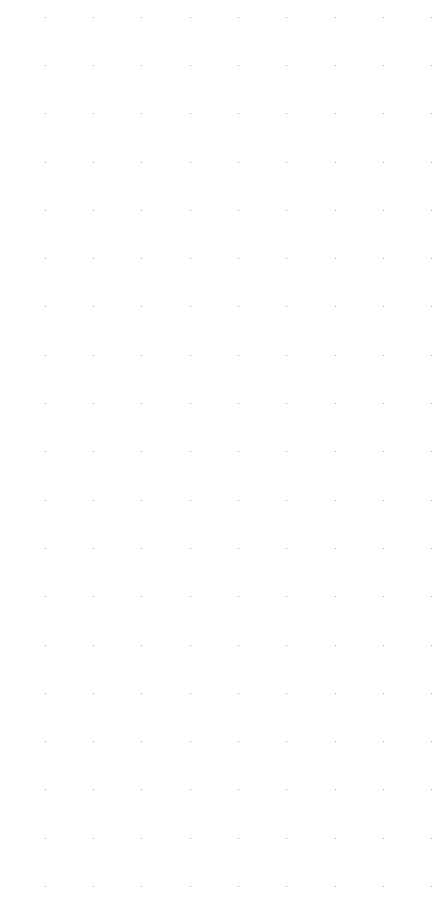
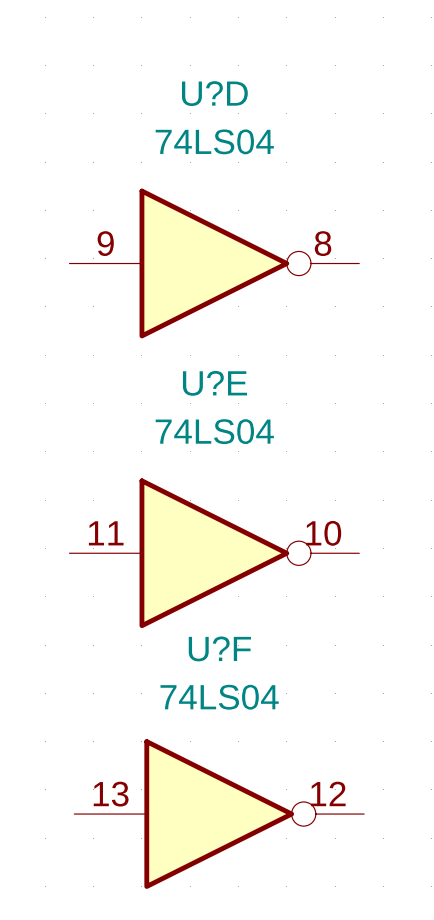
U?D: none -> 74LS04 (214, 263)
U?E: none -> 74LS04 (214, 553)
U?F: none -> 74LS04 (219, 814)

